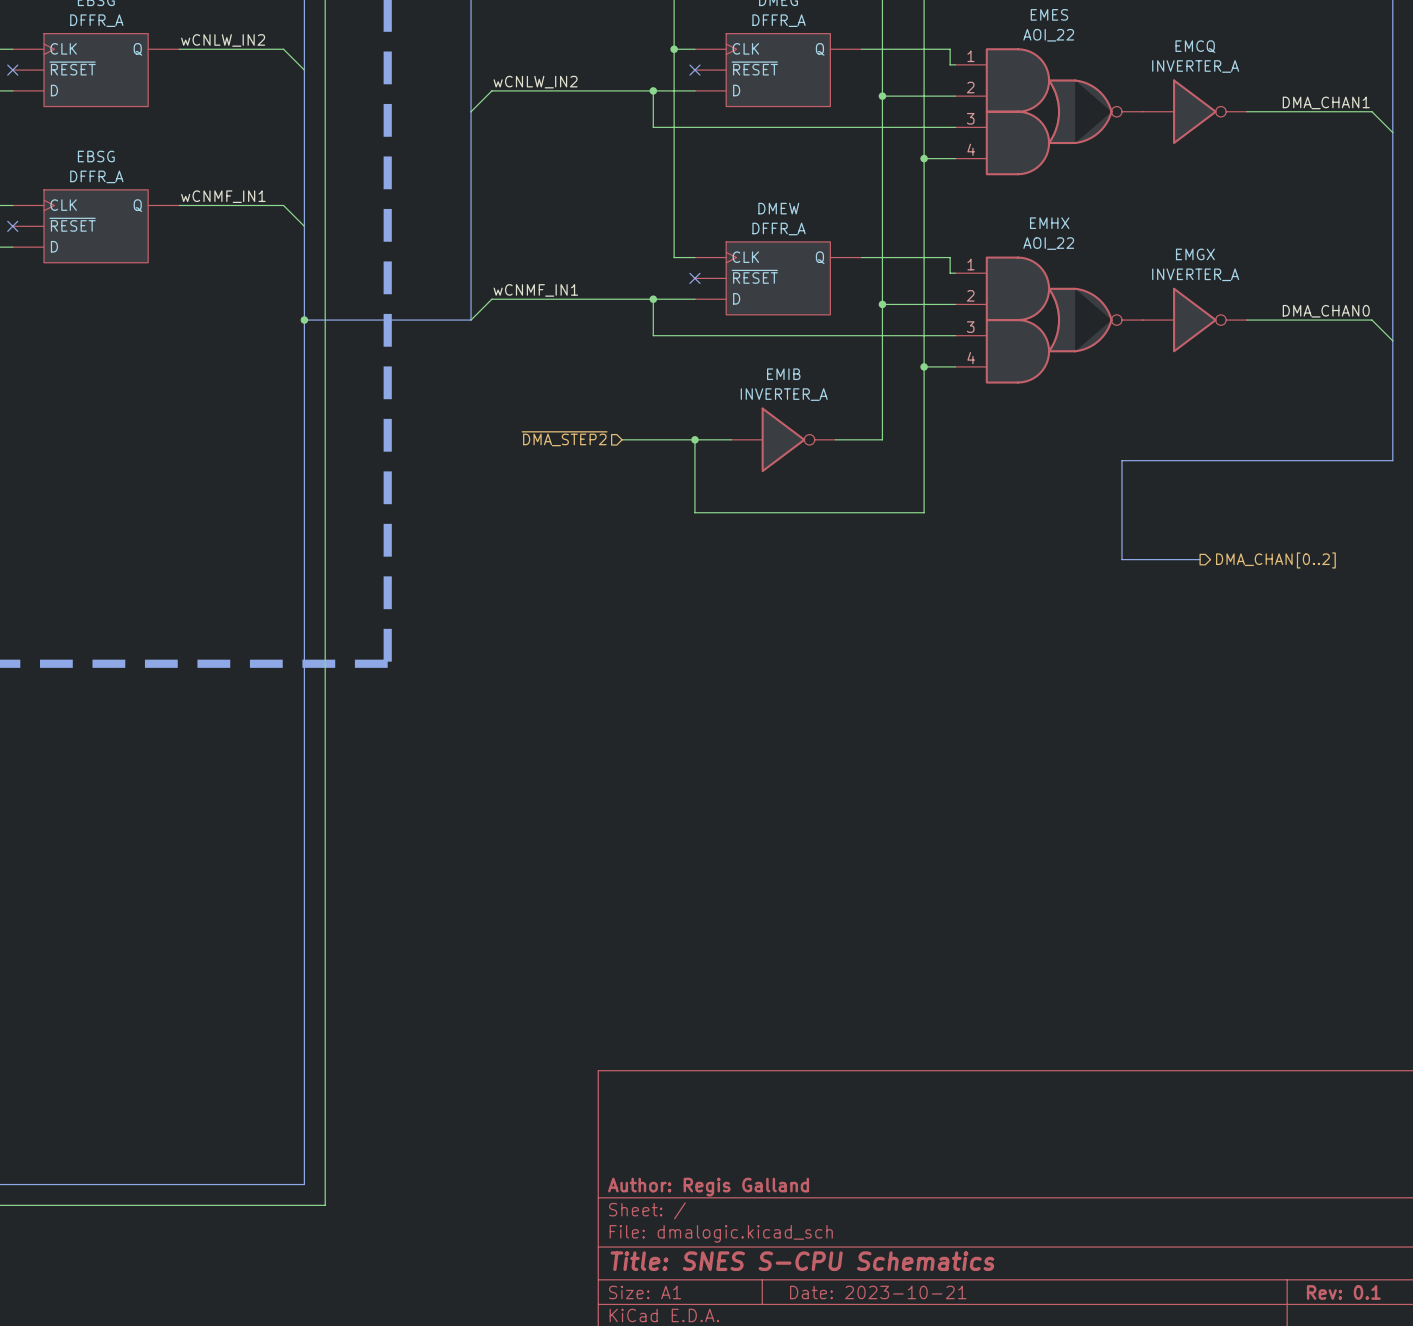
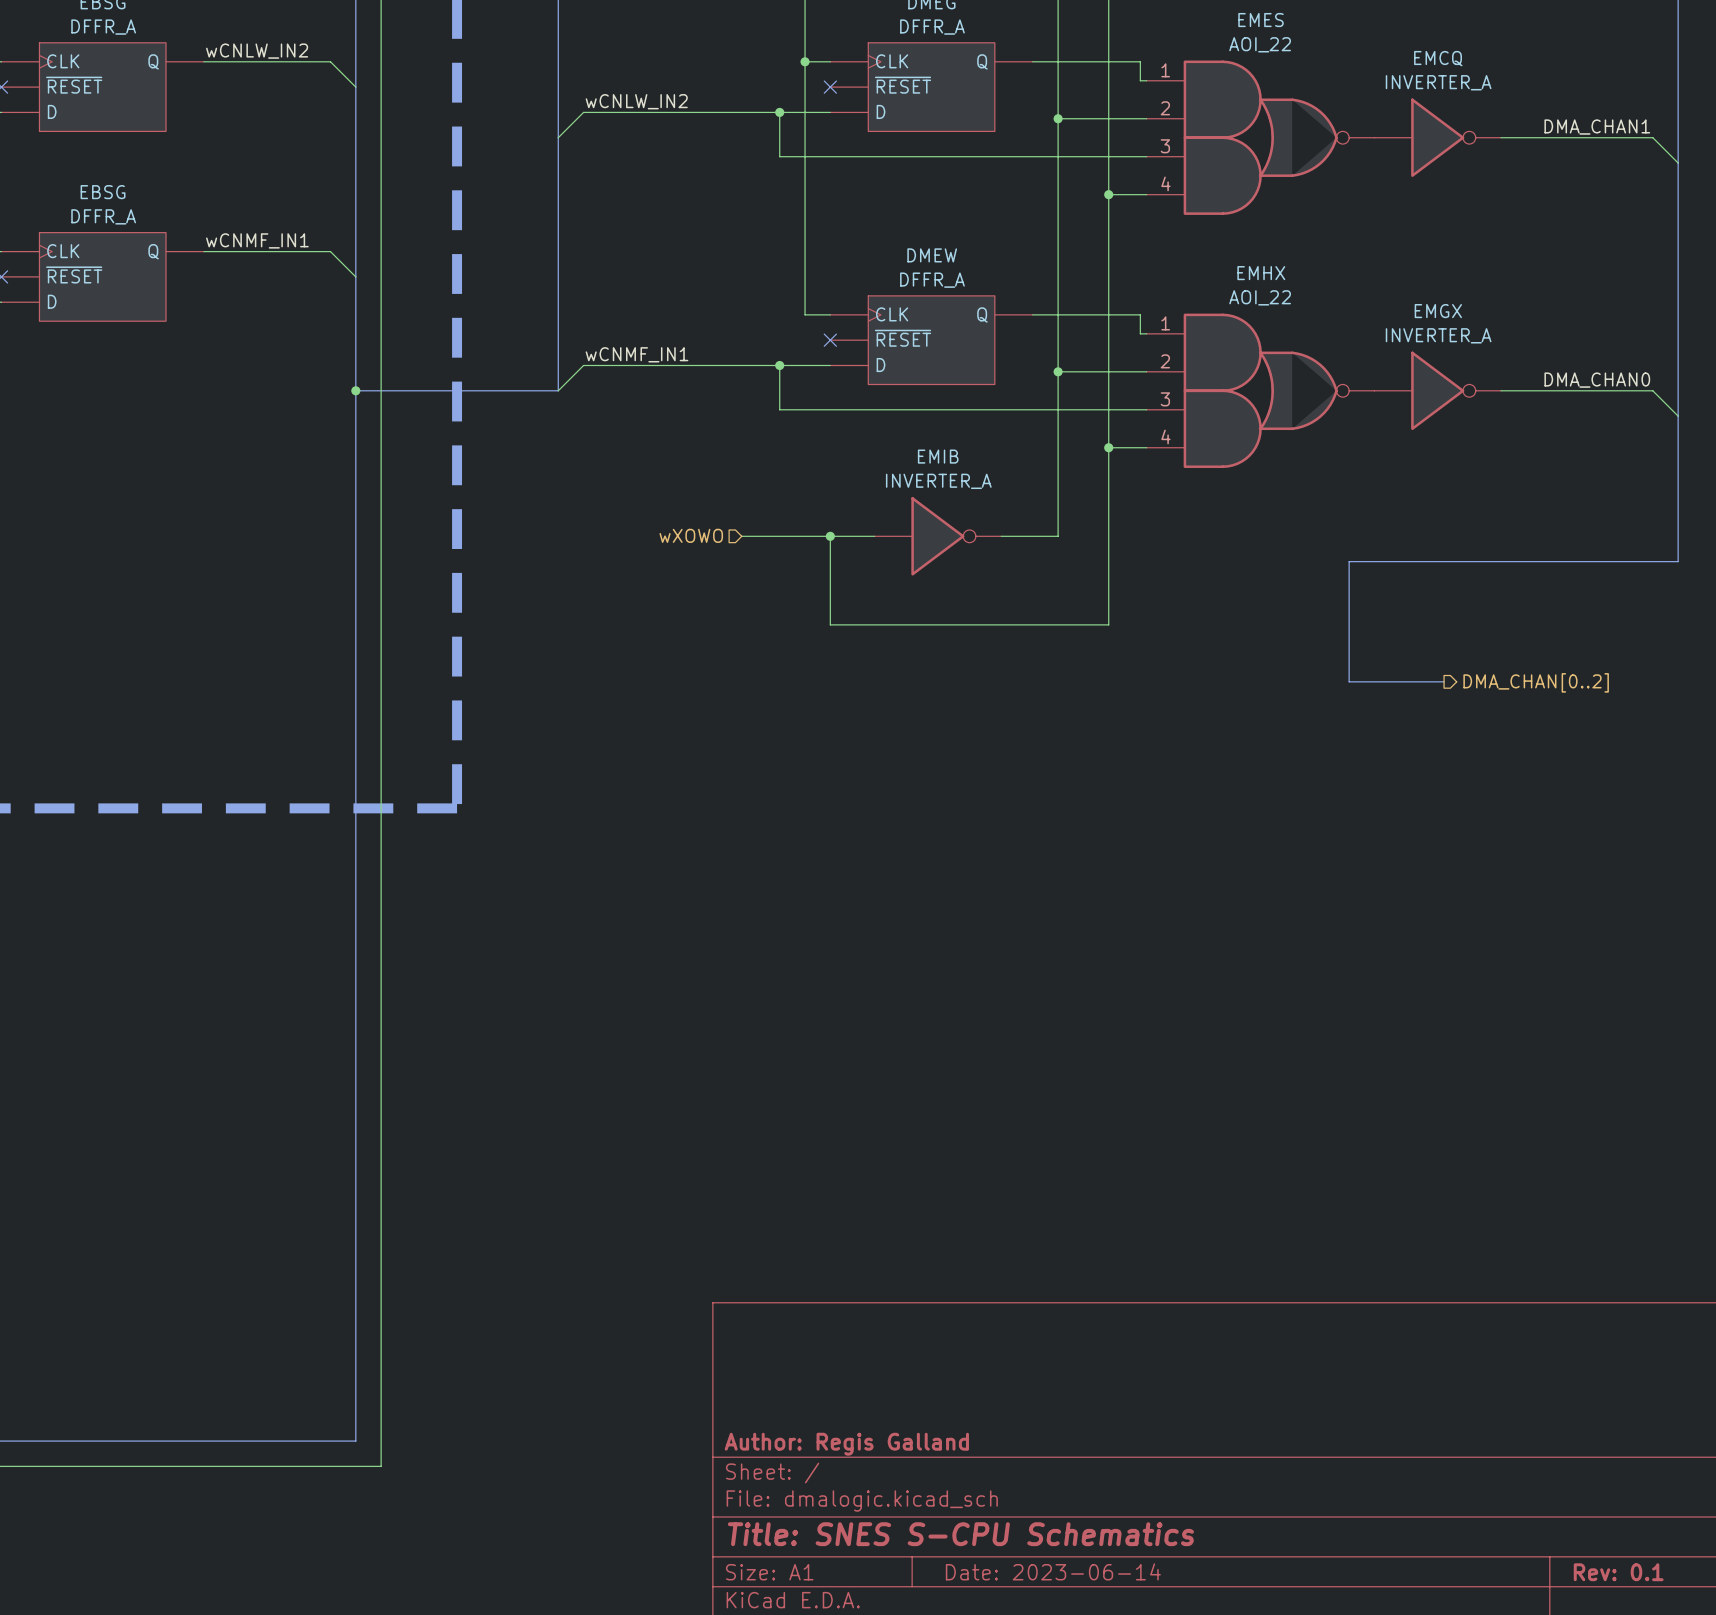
hierarchical label: ~{DMA_STEP2} (564, 438) -> wXOWO (691, 535)
title block: Date: 2023-10-21 (878, 1292) -> Date: 2023-06-14 (1053, 1571)

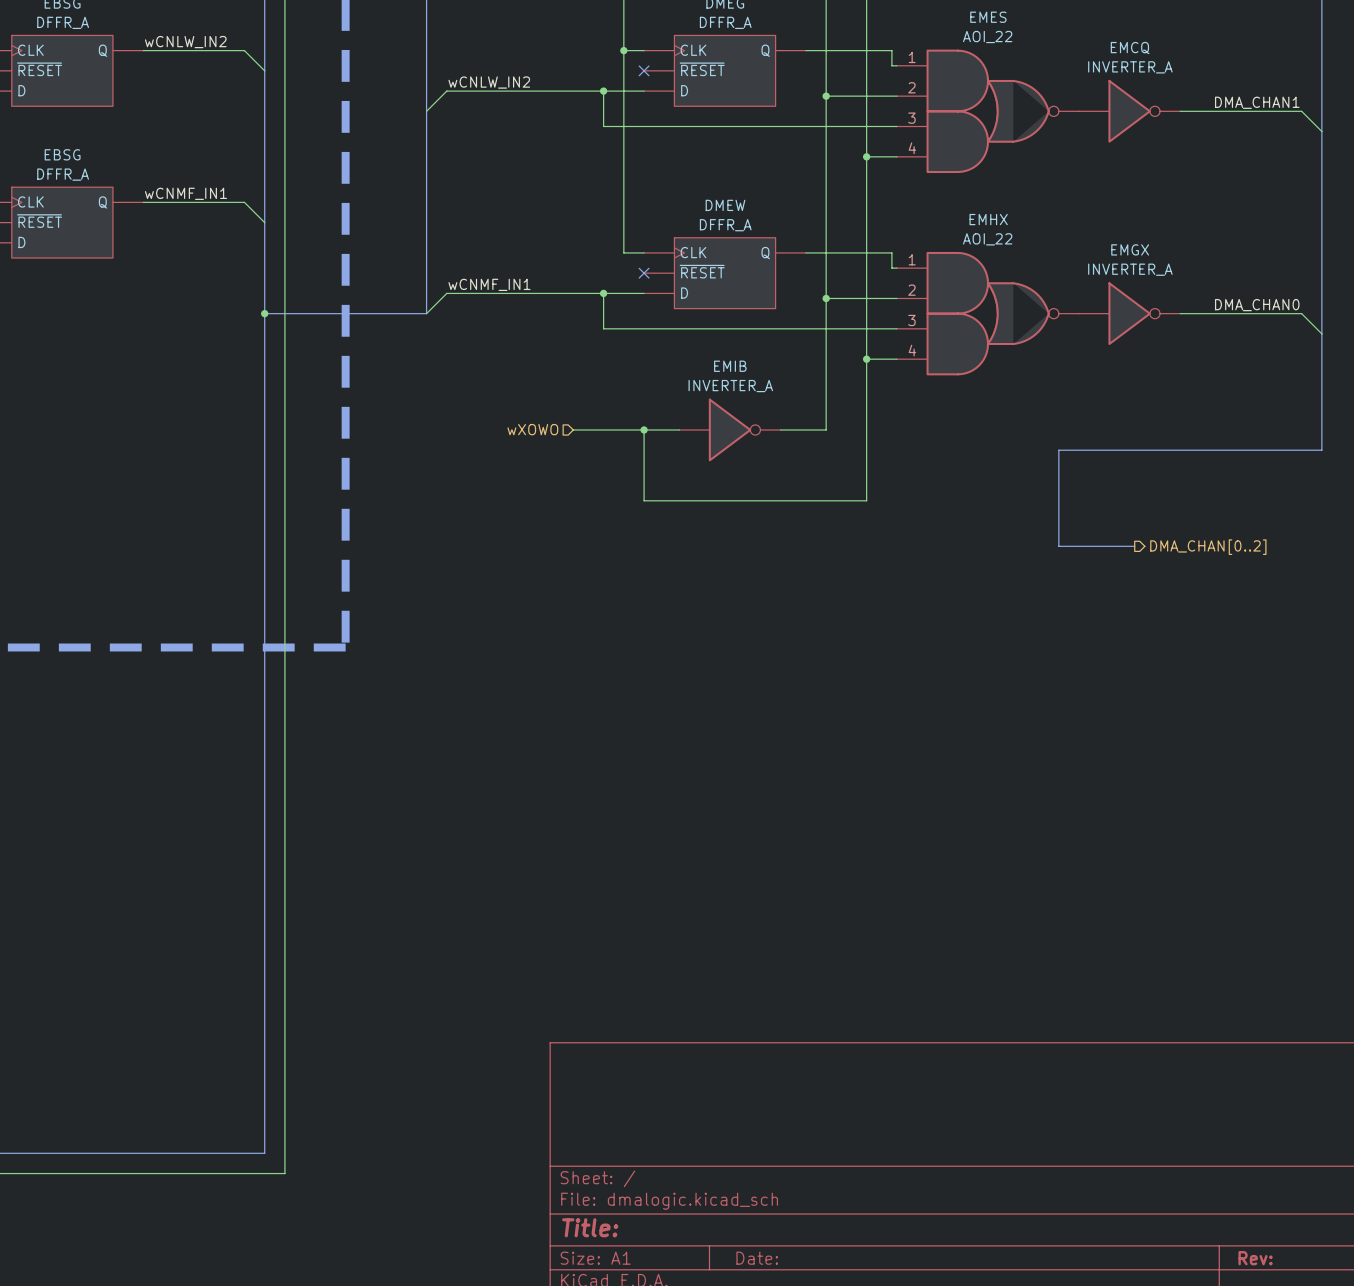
title block: Author: Regis Galland (846, 1444) -> none
title block: Title: SNES S-CPU Schematics (960, 1534) -> Title: (590, 1227)
title block: Date: 2023-06-14 (1053, 1571) -> Date: (757, 1258)
title block: Rev: 0.1 (1618, 1572) -> Rev: (1255, 1258)

